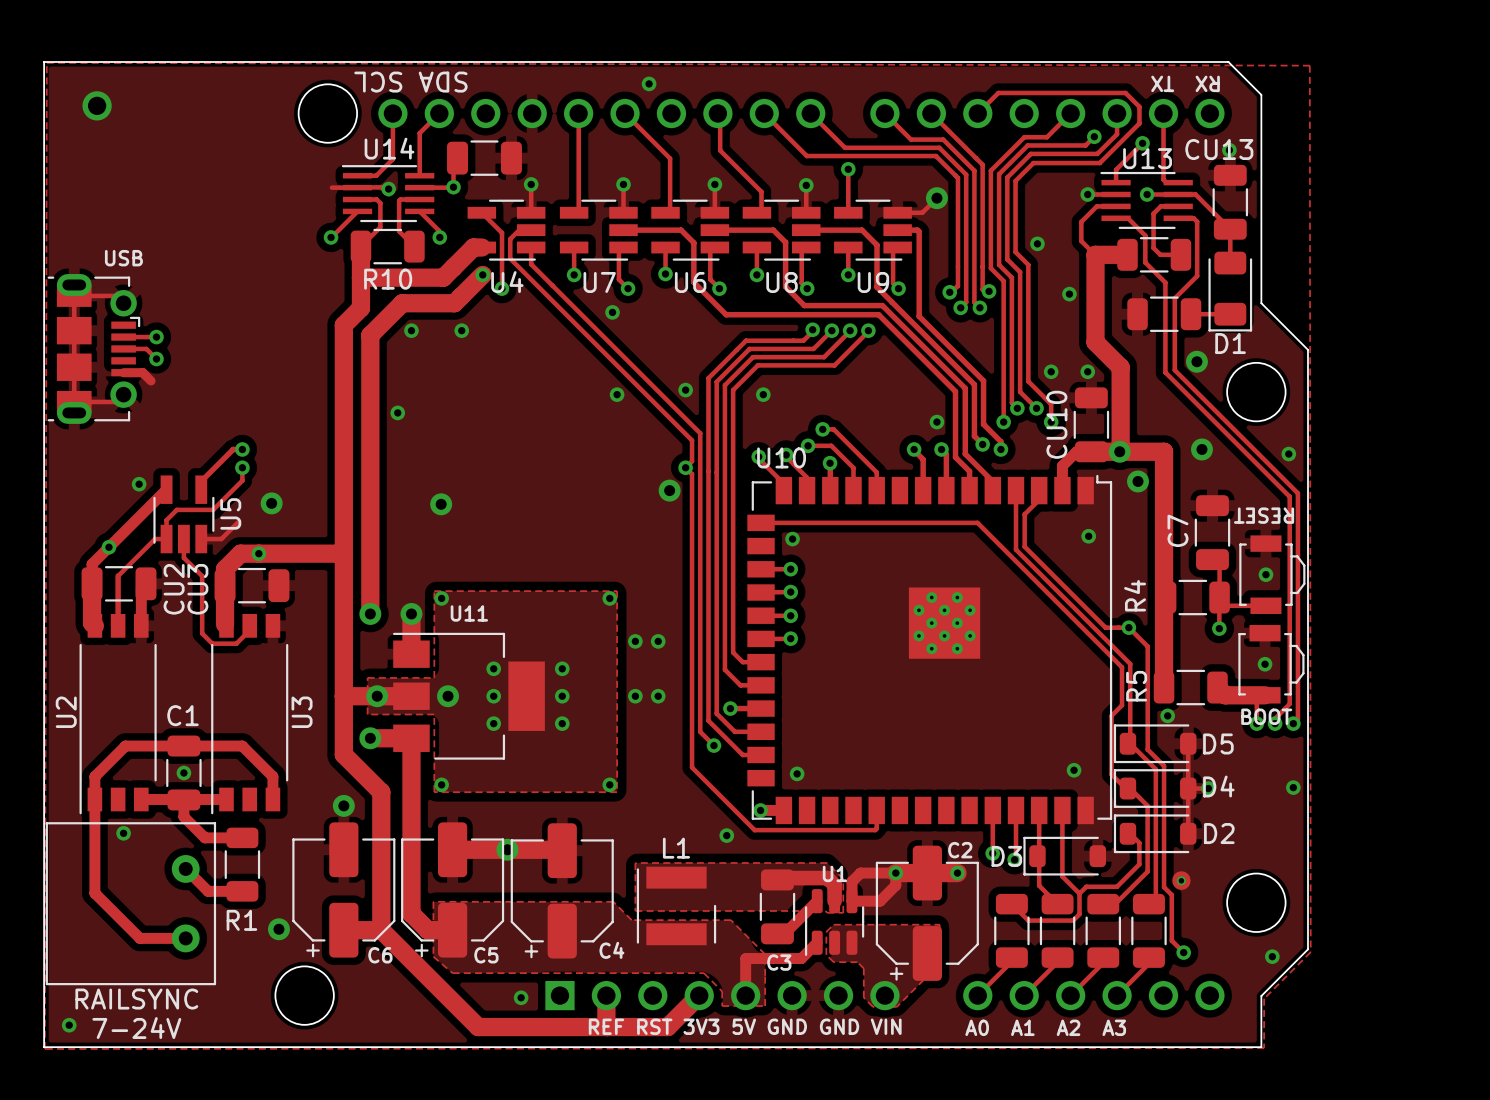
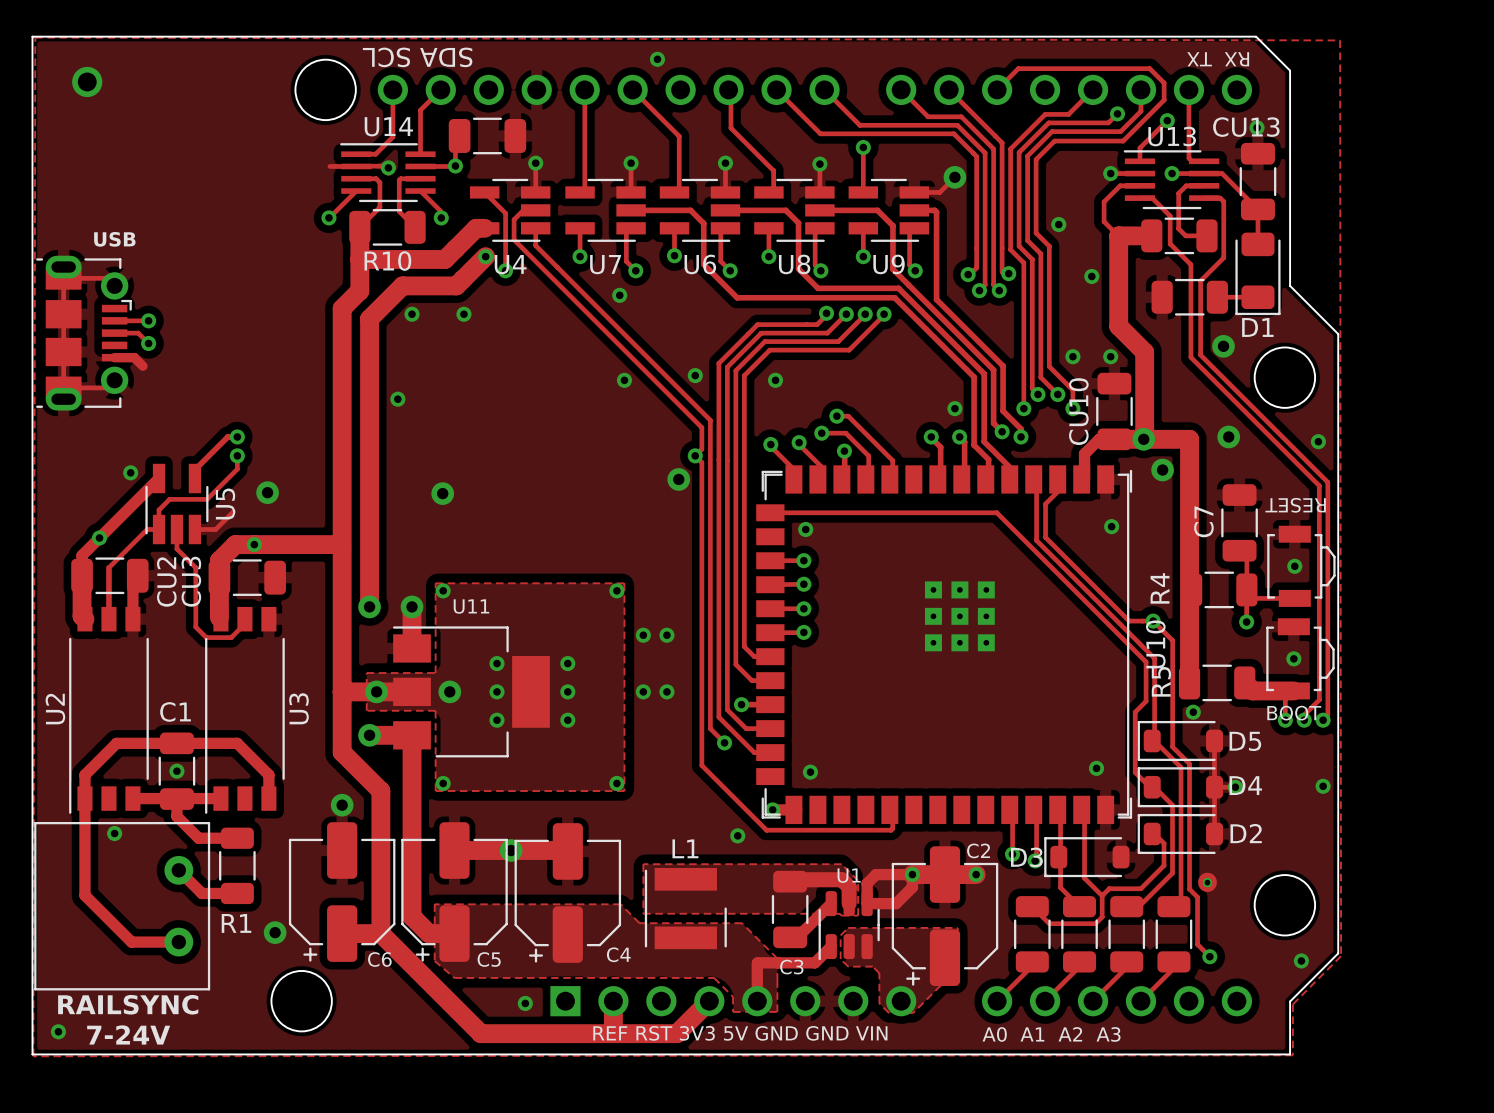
U10 name position: U10 (781, 457) -> U10 (1155, 644)
U10 footprint: [747, 474, 1113, 825] -> [756, 465, 1133, 825]

